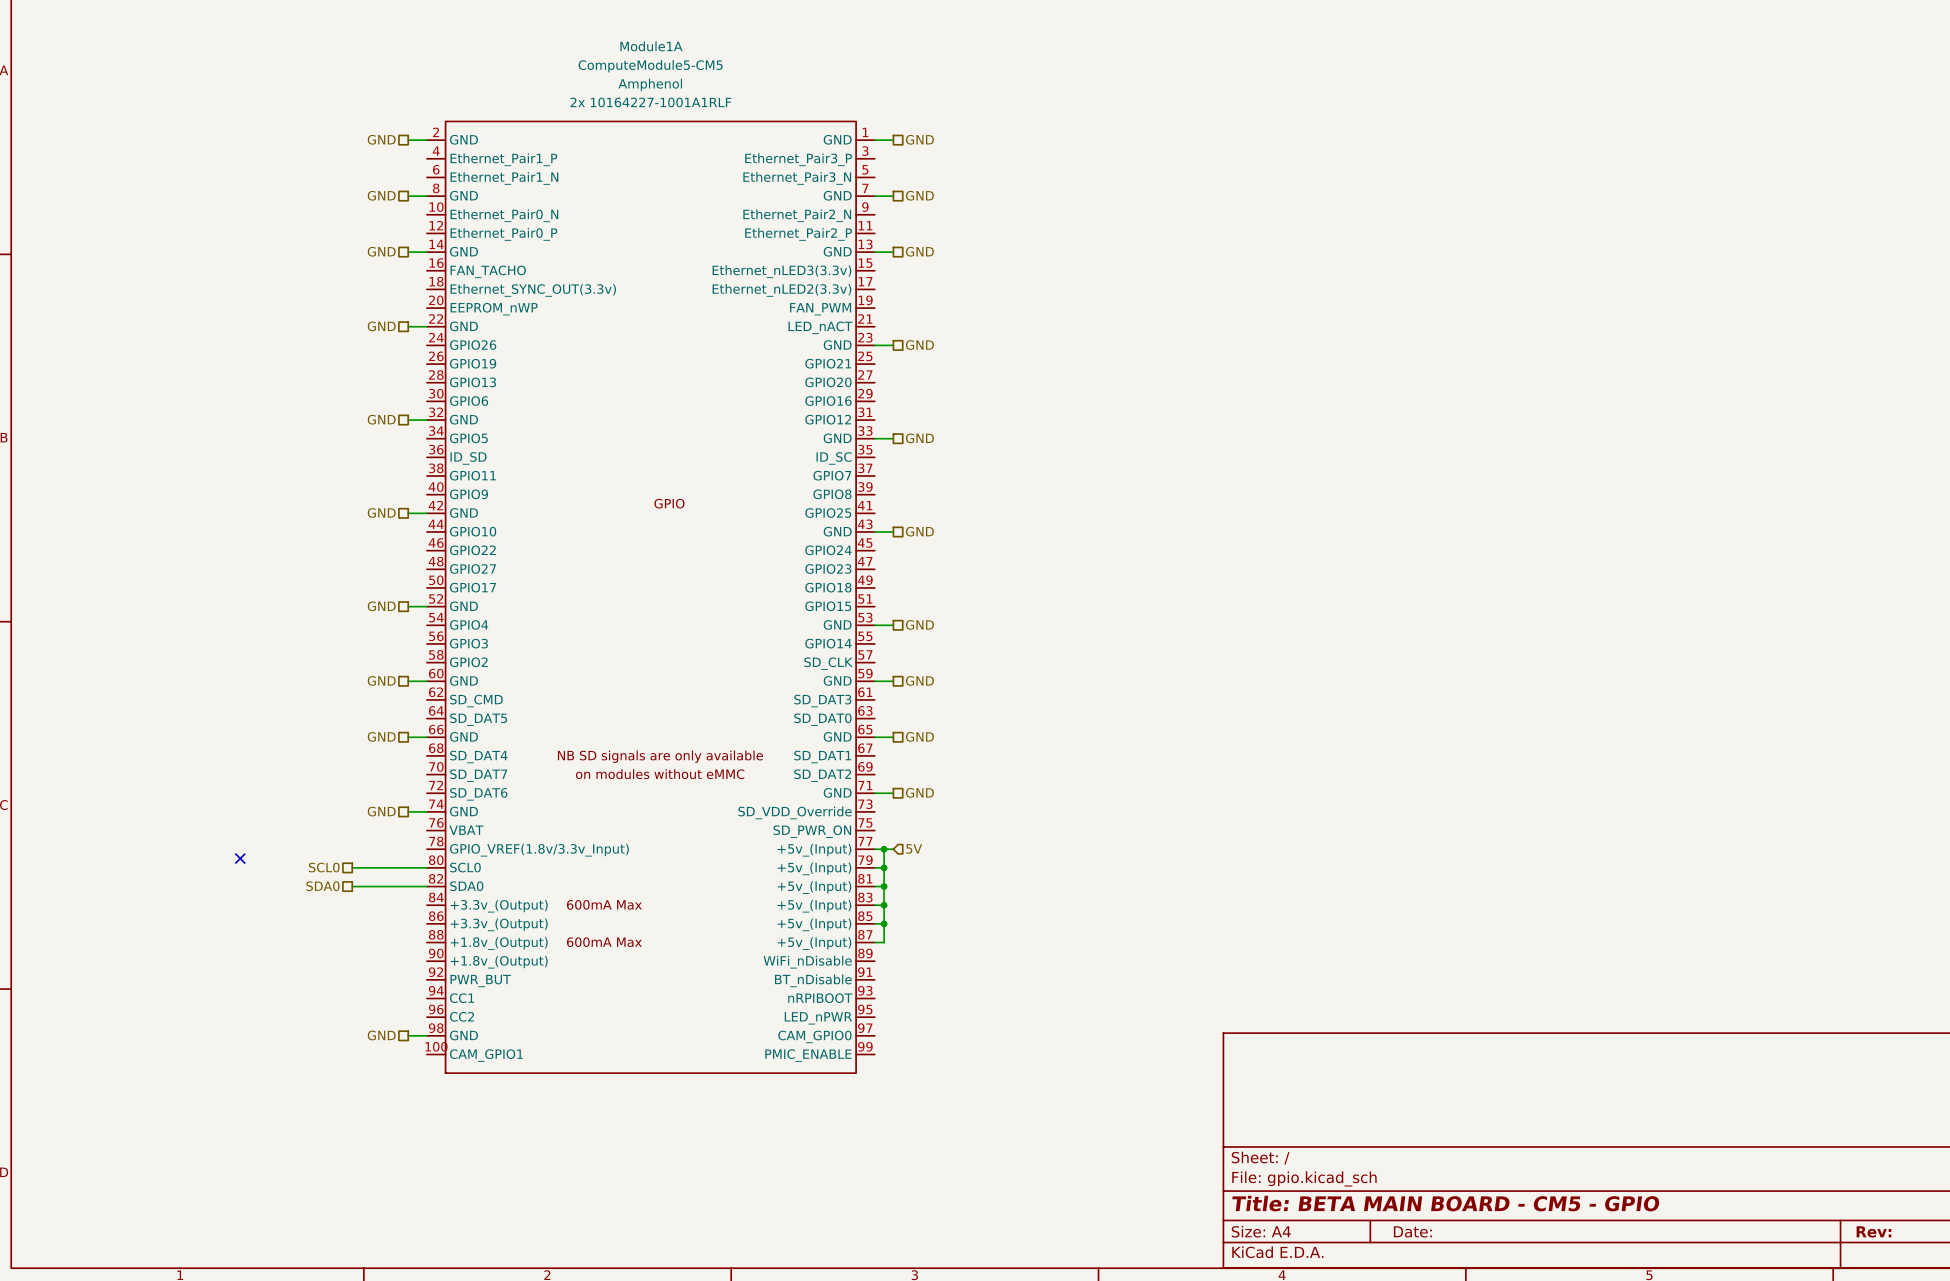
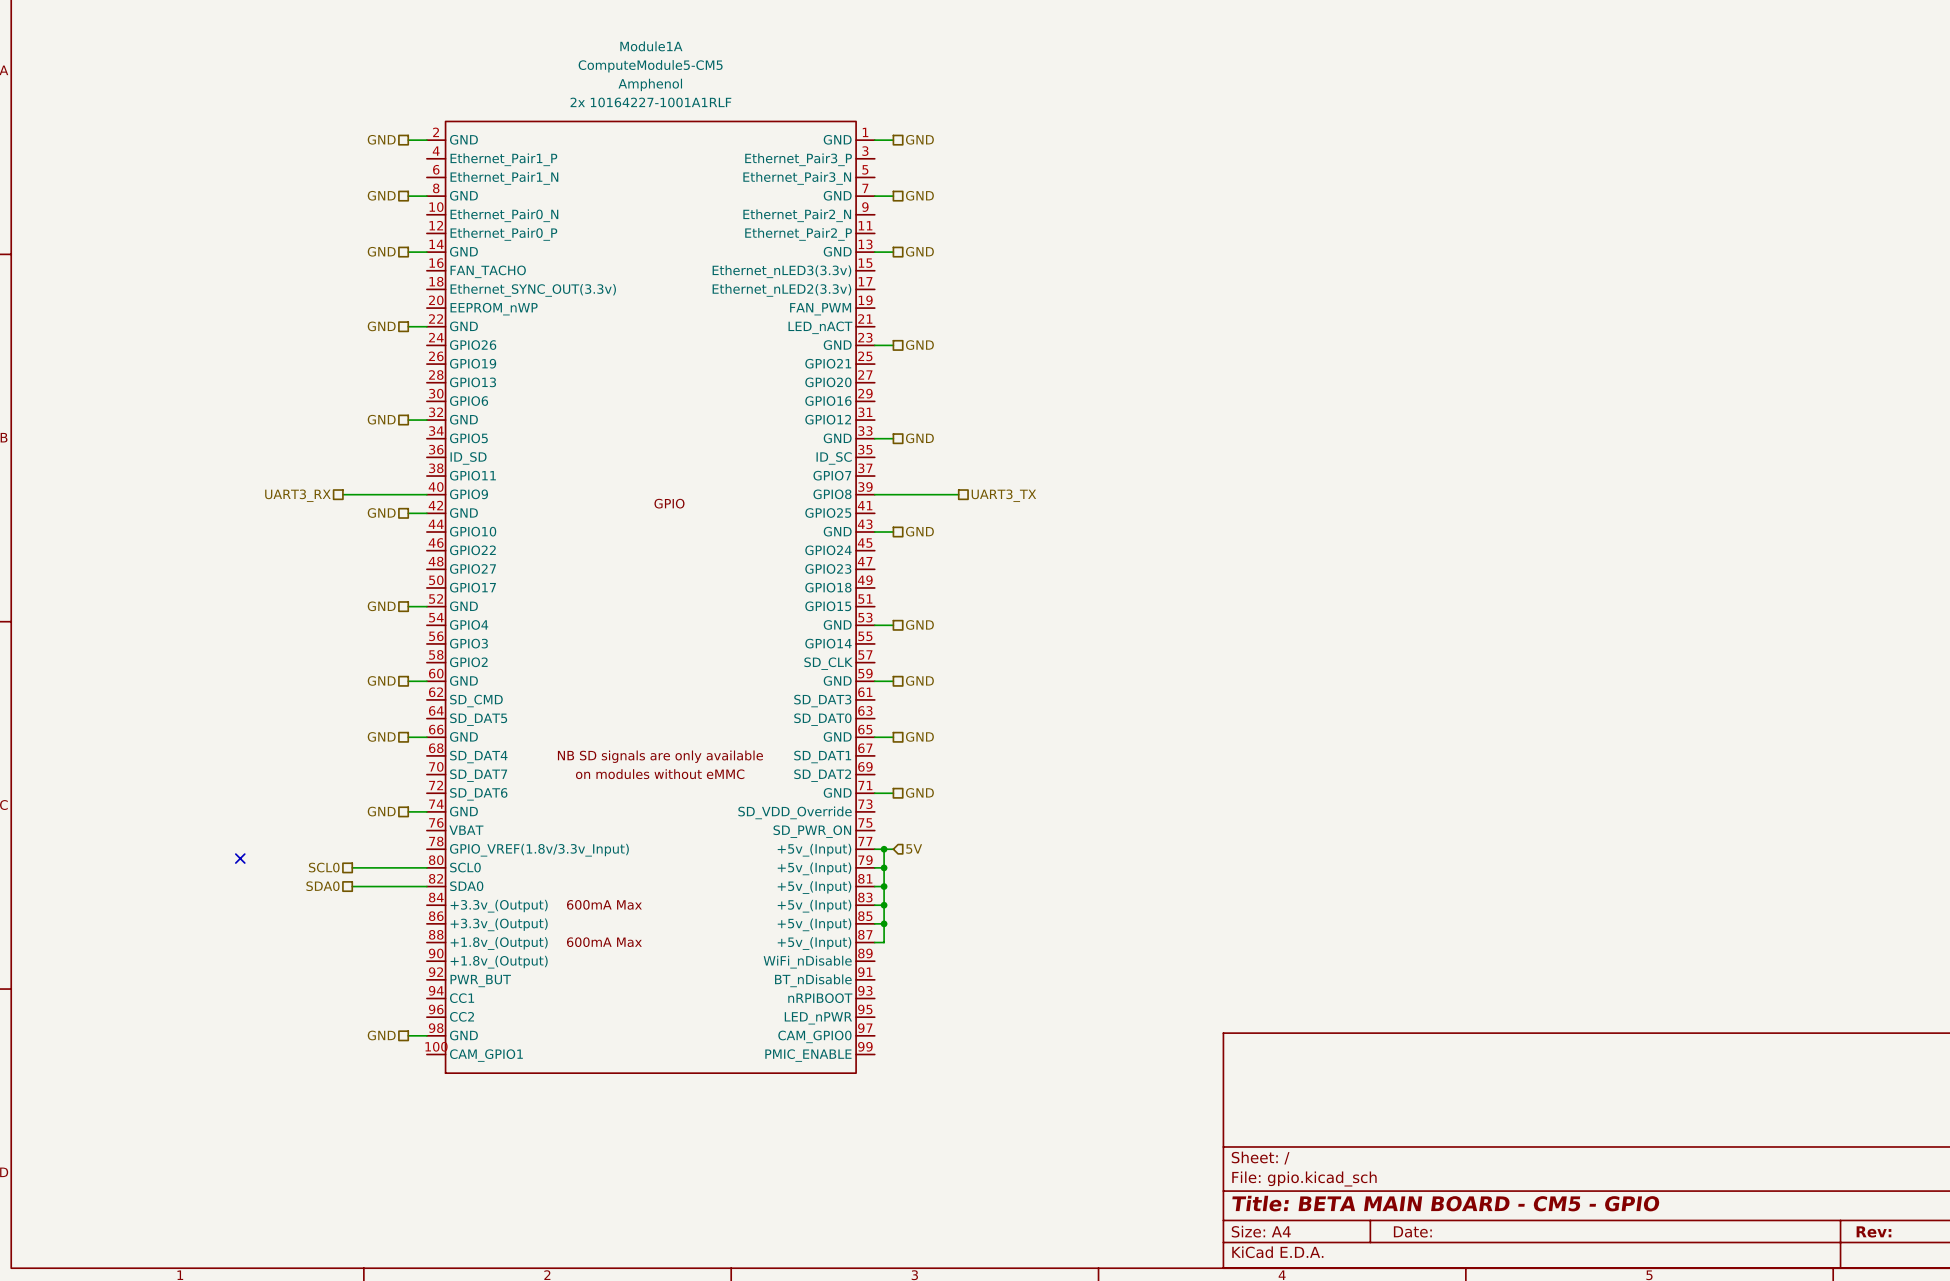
wire: none -> (342, 494) (426, 494)
wire: none -> (874, 494) (958, 494)
hierarchical label: none -> UART3_RX (297, 495)
hierarchical label: none -> UART3_TX (1003, 495)

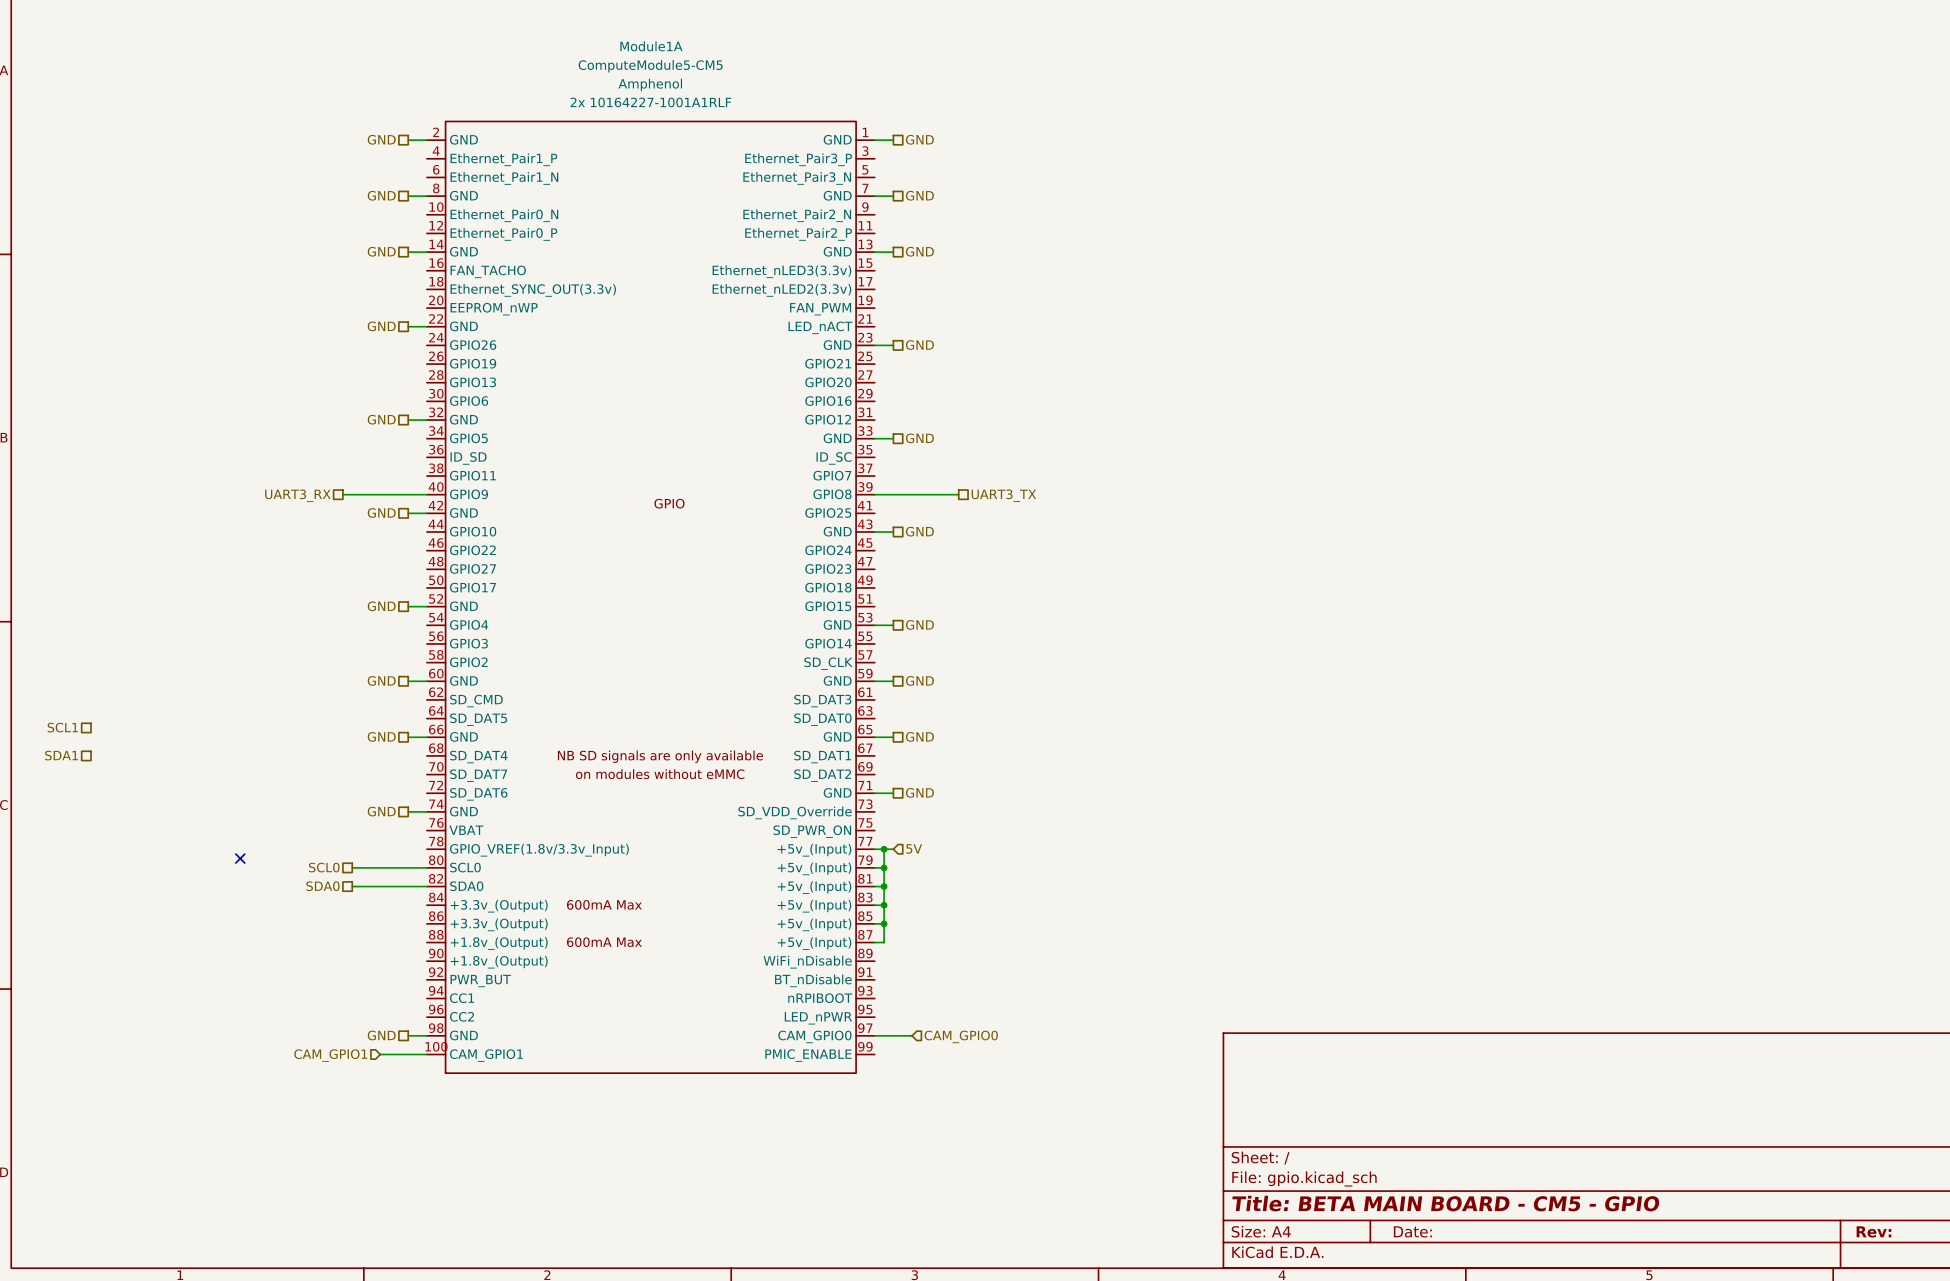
hierarchical label: none -> SCL1 (62, 727)
hierarchical label: none -> SDA1 (61, 755)
wire: none -> (874, 1035) (912, 1035)
hierarchical label: none -> CAM_GPIO0 (961, 1036)
wire: none -> (380, 1054) (426, 1054)
hierarchical label: none -> CAM_GPIO1 (330, 1055)

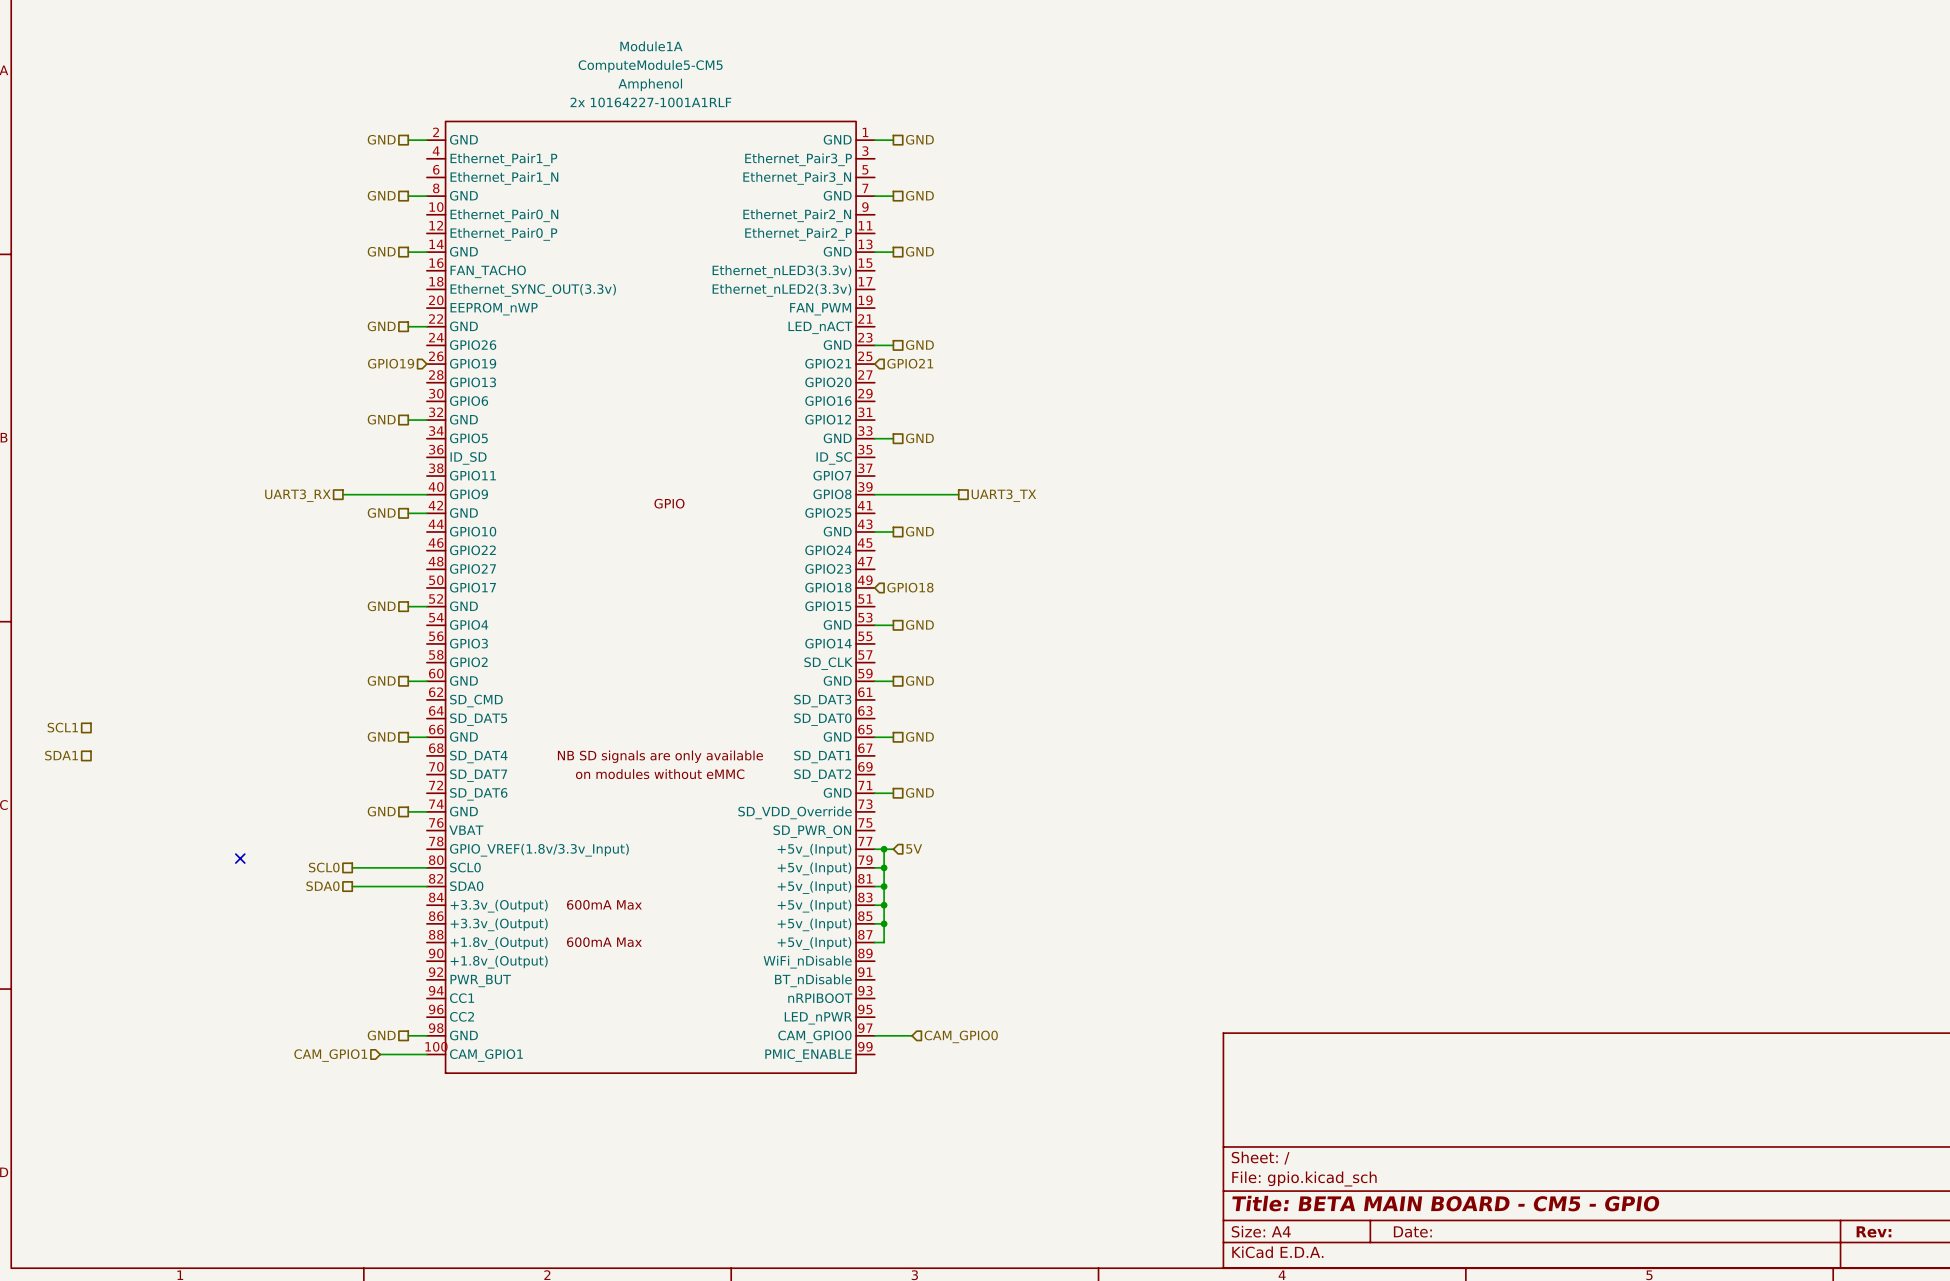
hierarchical label: none -> GPIO19 (391, 363)
hierarchical label: none -> GPIO21 (910, 363)
hierarchical label: none -> GPIO18 (910, 587)

